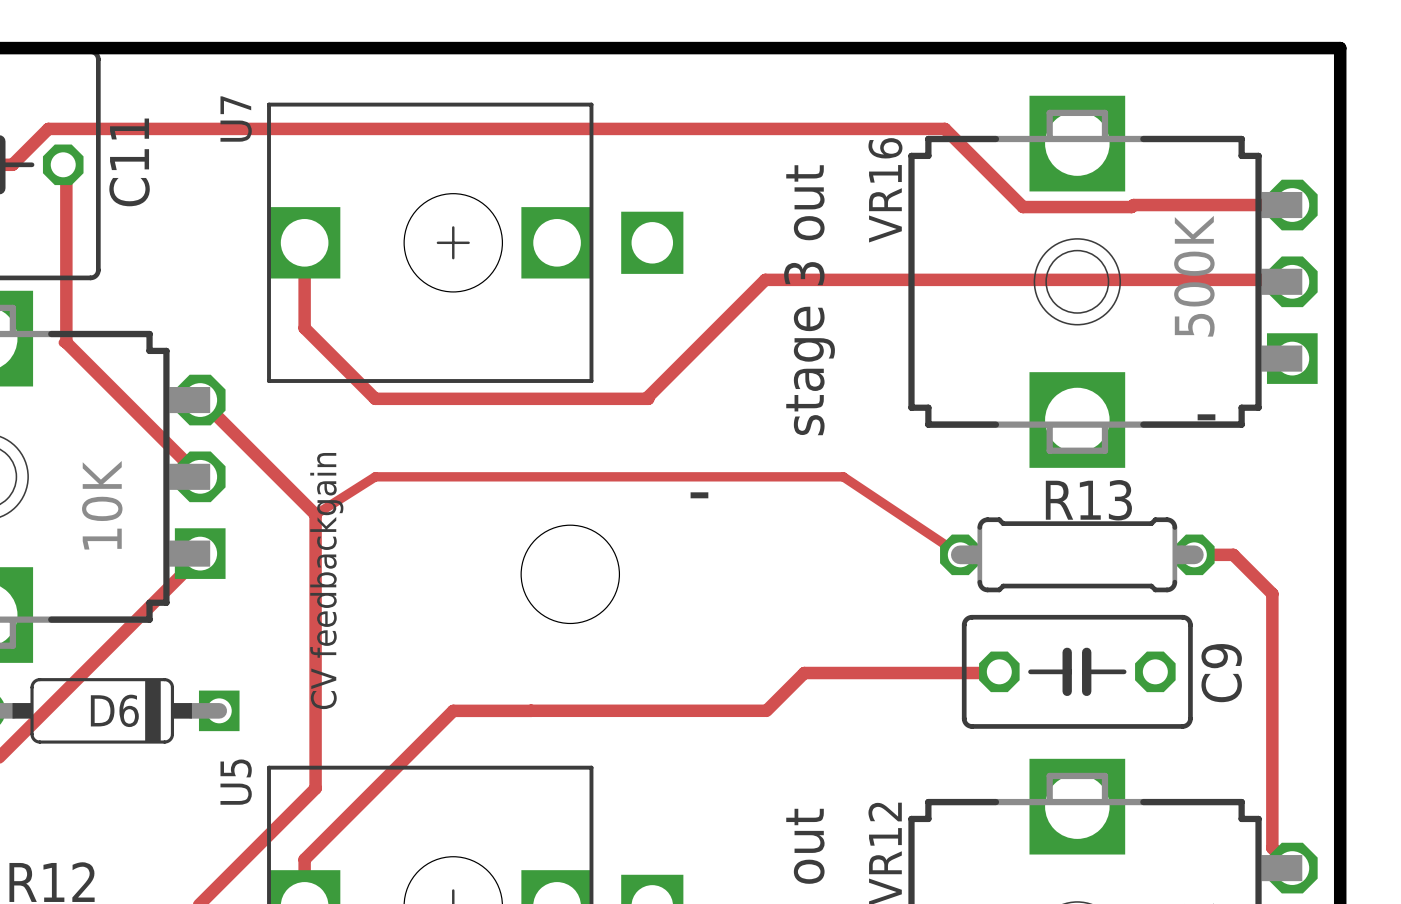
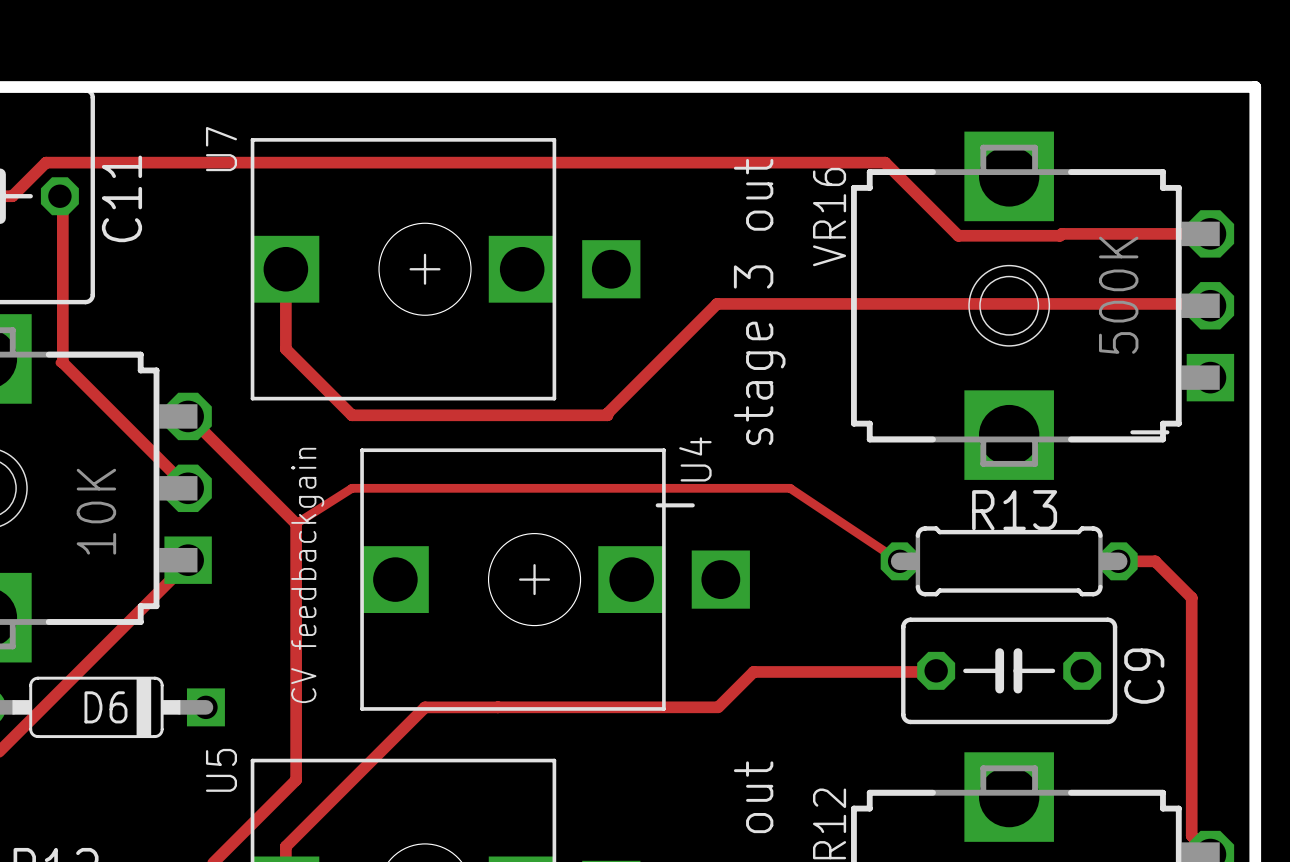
U4: none -> (555, 579)

